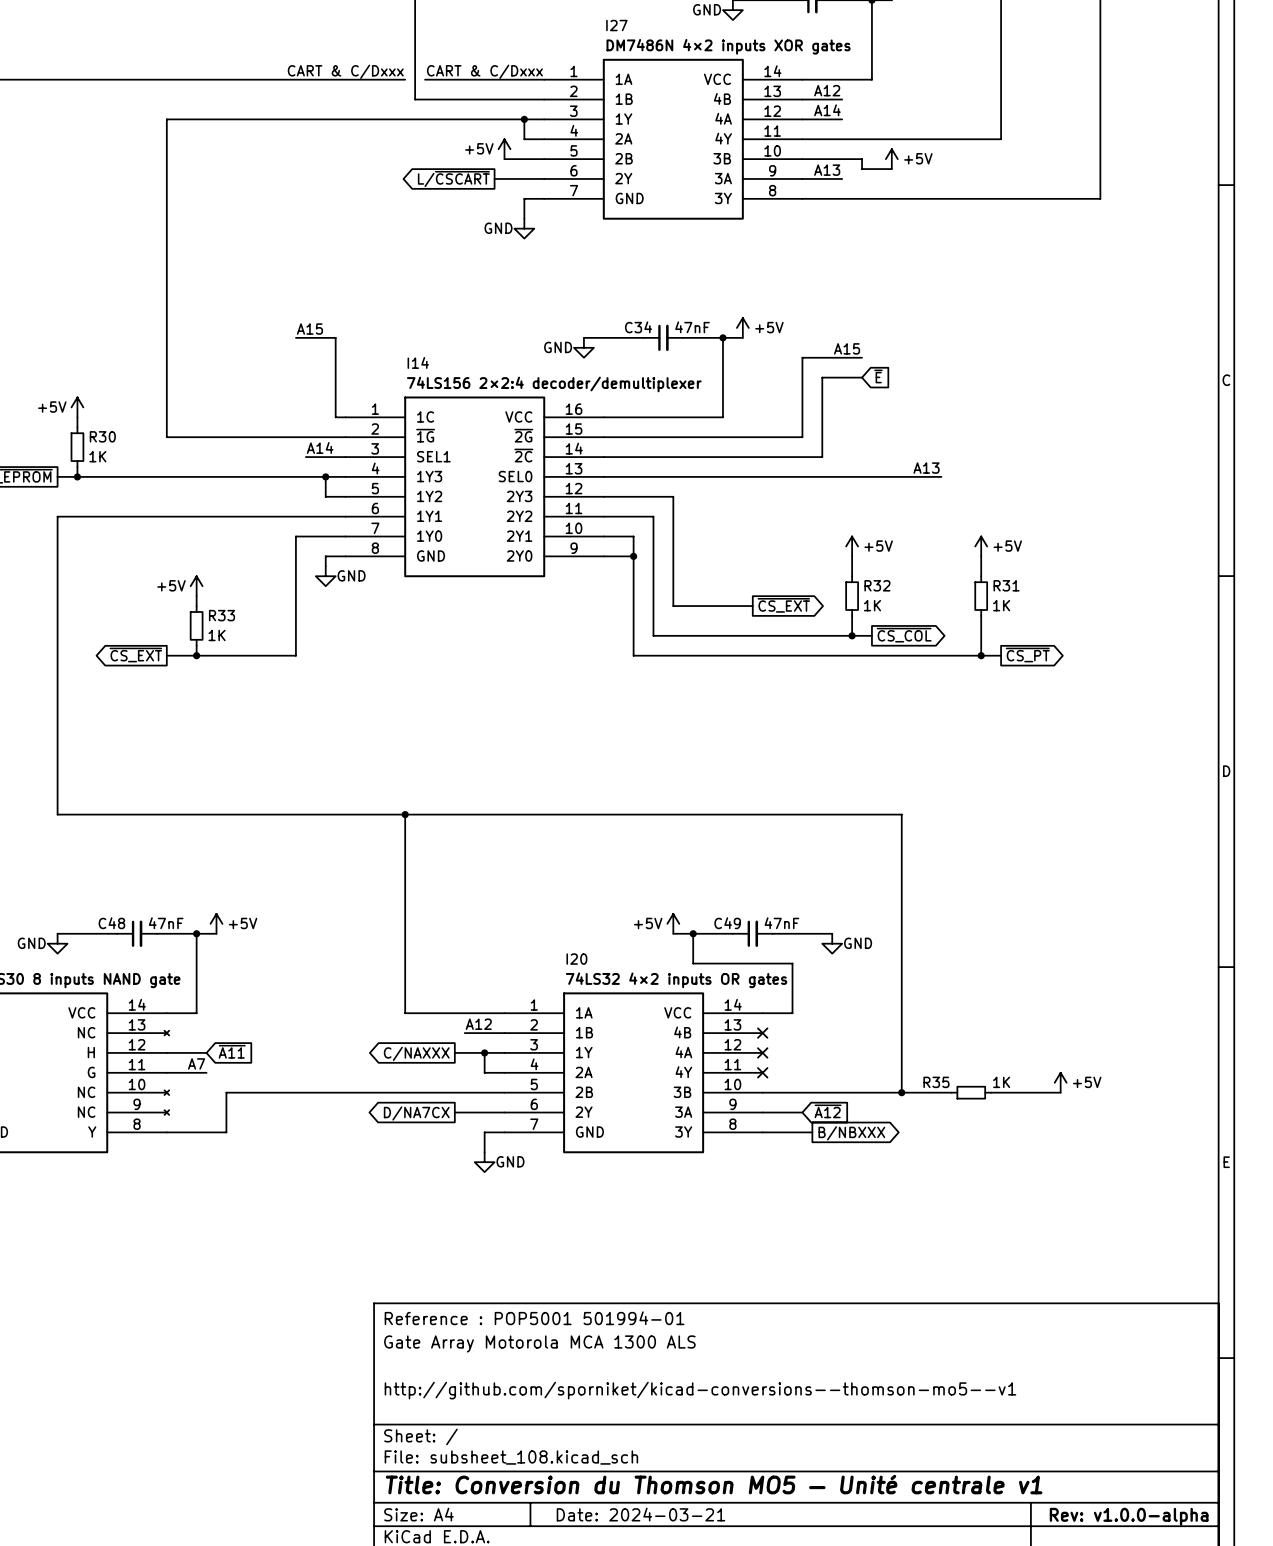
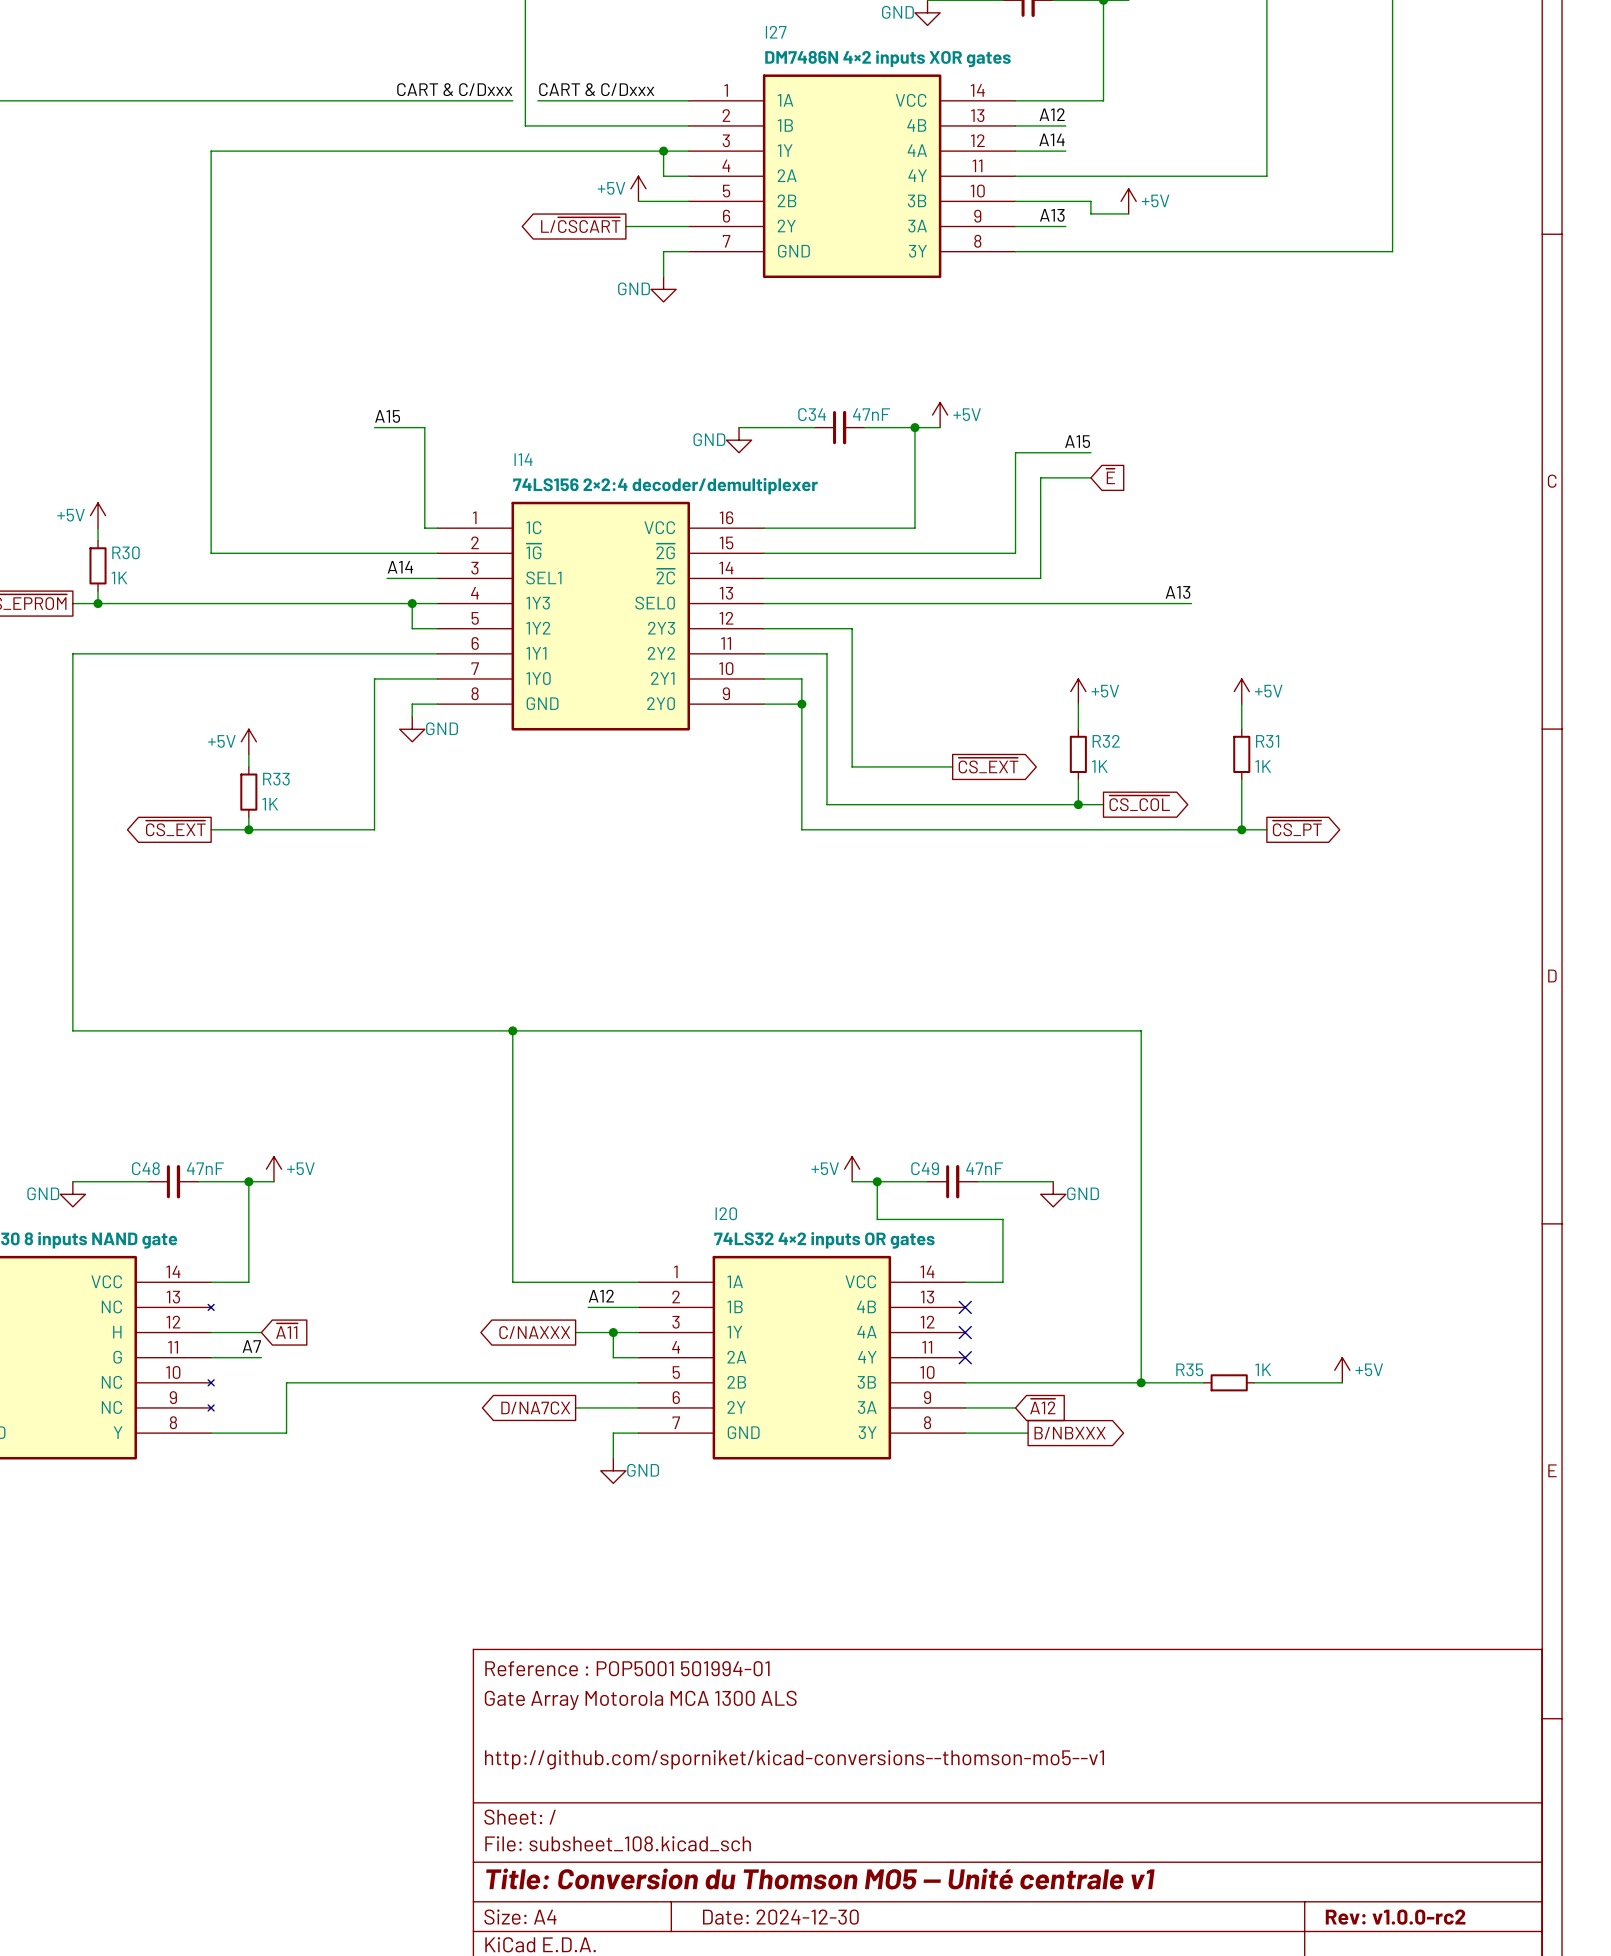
title block: Date: 2024-03-21 (641, 1514) -> Date: 2024-12-30 (780, 1917)
title block: Rev: v1.0.0-alpha (1129, 1516) -> Rev: v1.0.0-rc2 (1395, 1917)

